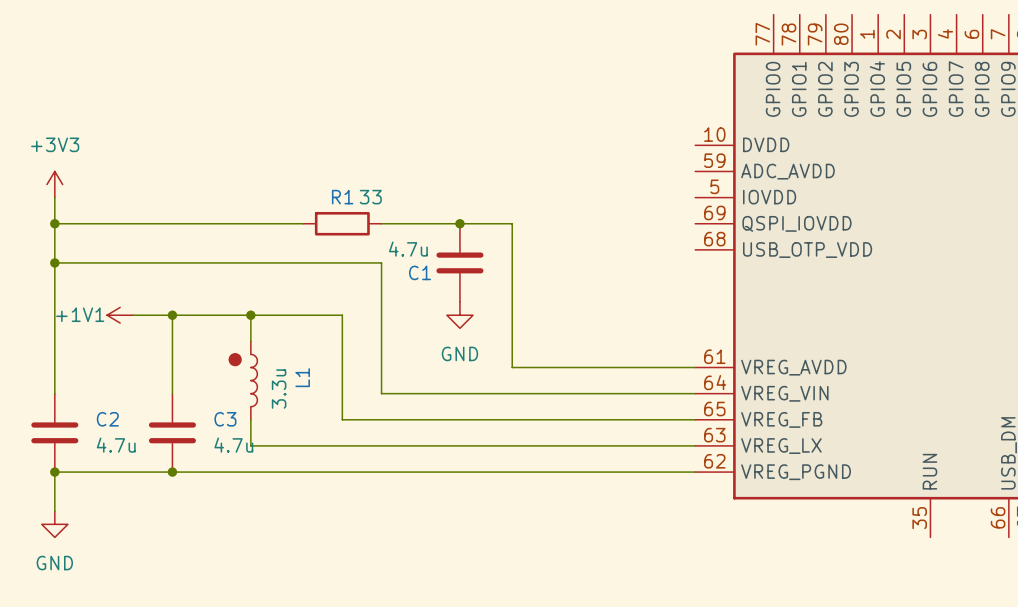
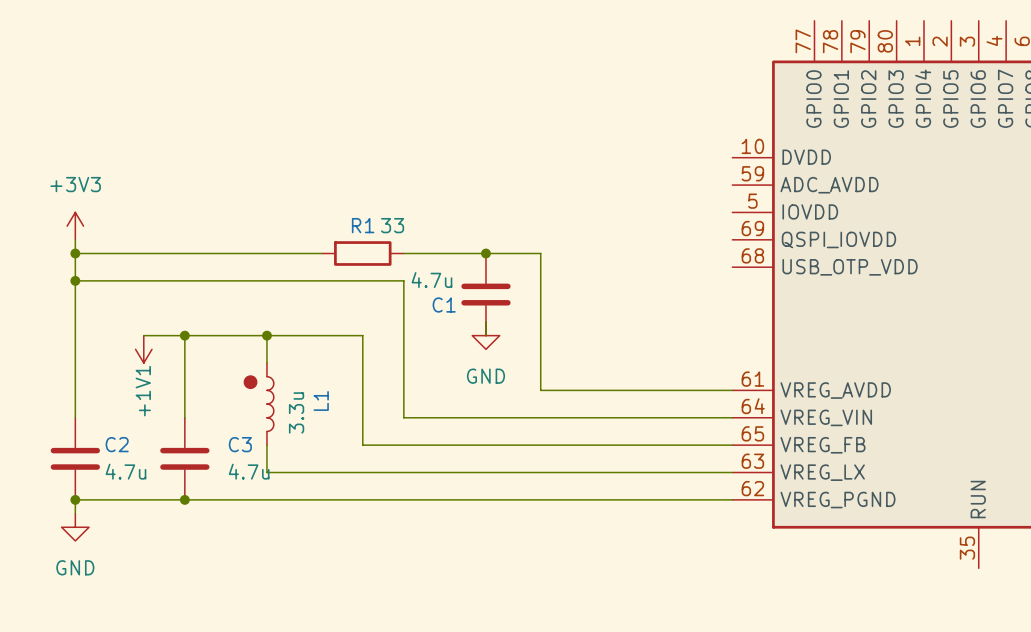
power symbol position: +3V3 (54, 184) -> +3V3 (75, 226)
wire: (54, 197) (54, 393) -> none
wire: (54, 223) (303, 223) -> none
junction: (54, 223) -> none
wire: none -> (75, 239) (75, 417)
R1 position: (342, 223) -> (362, 253)
wire: (381, 223) (512, 223) (512, 236) -> (403, 253) (540, 253)
junction position: (459, 223) -> (485, 253)
wire: none -> (75, 253) (321, 253)
junction: none -> (75, 253)
wire: (54, 262) (67, 262) -> none
junction position: (54, 262) -> (75, 280)
C1 position: (459, 262) -> (485, 294)
power symbol rotation: 0° (120, 315) -> 90° counterclockwise (143, 349)
power symbol position: +1V1 (120, 315) -> +1V1 (143, 349)
C2 position: (54, 432) -> (75, 458)
junction position: (54, 472) -> (75, 499)
wire: (67, 472) (54, 472) (54, 511) -> (75, 499) (75, 513)
power symbol position: GND (54, 524) -> GND (75, 527)

